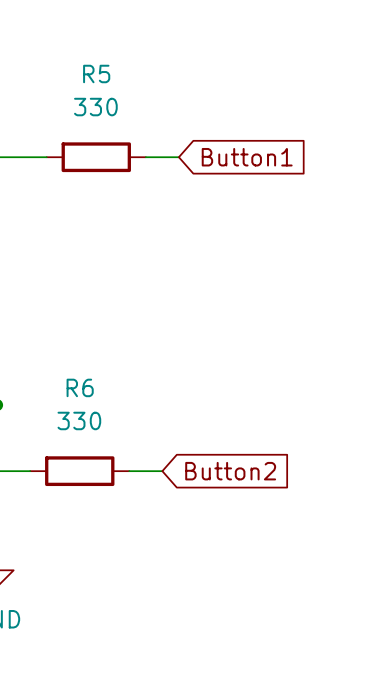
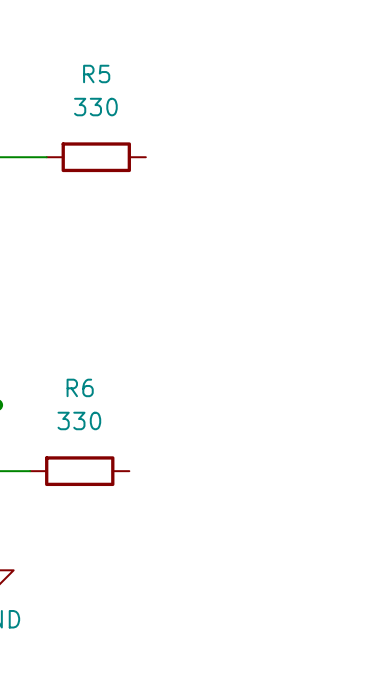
wire: (145, 157) (178, 157) -> none
global label: Button1 (247, 157) -> none
wire: (129, 471) (162, 471) -> none
global label: Button2 (230, 471) -> none

